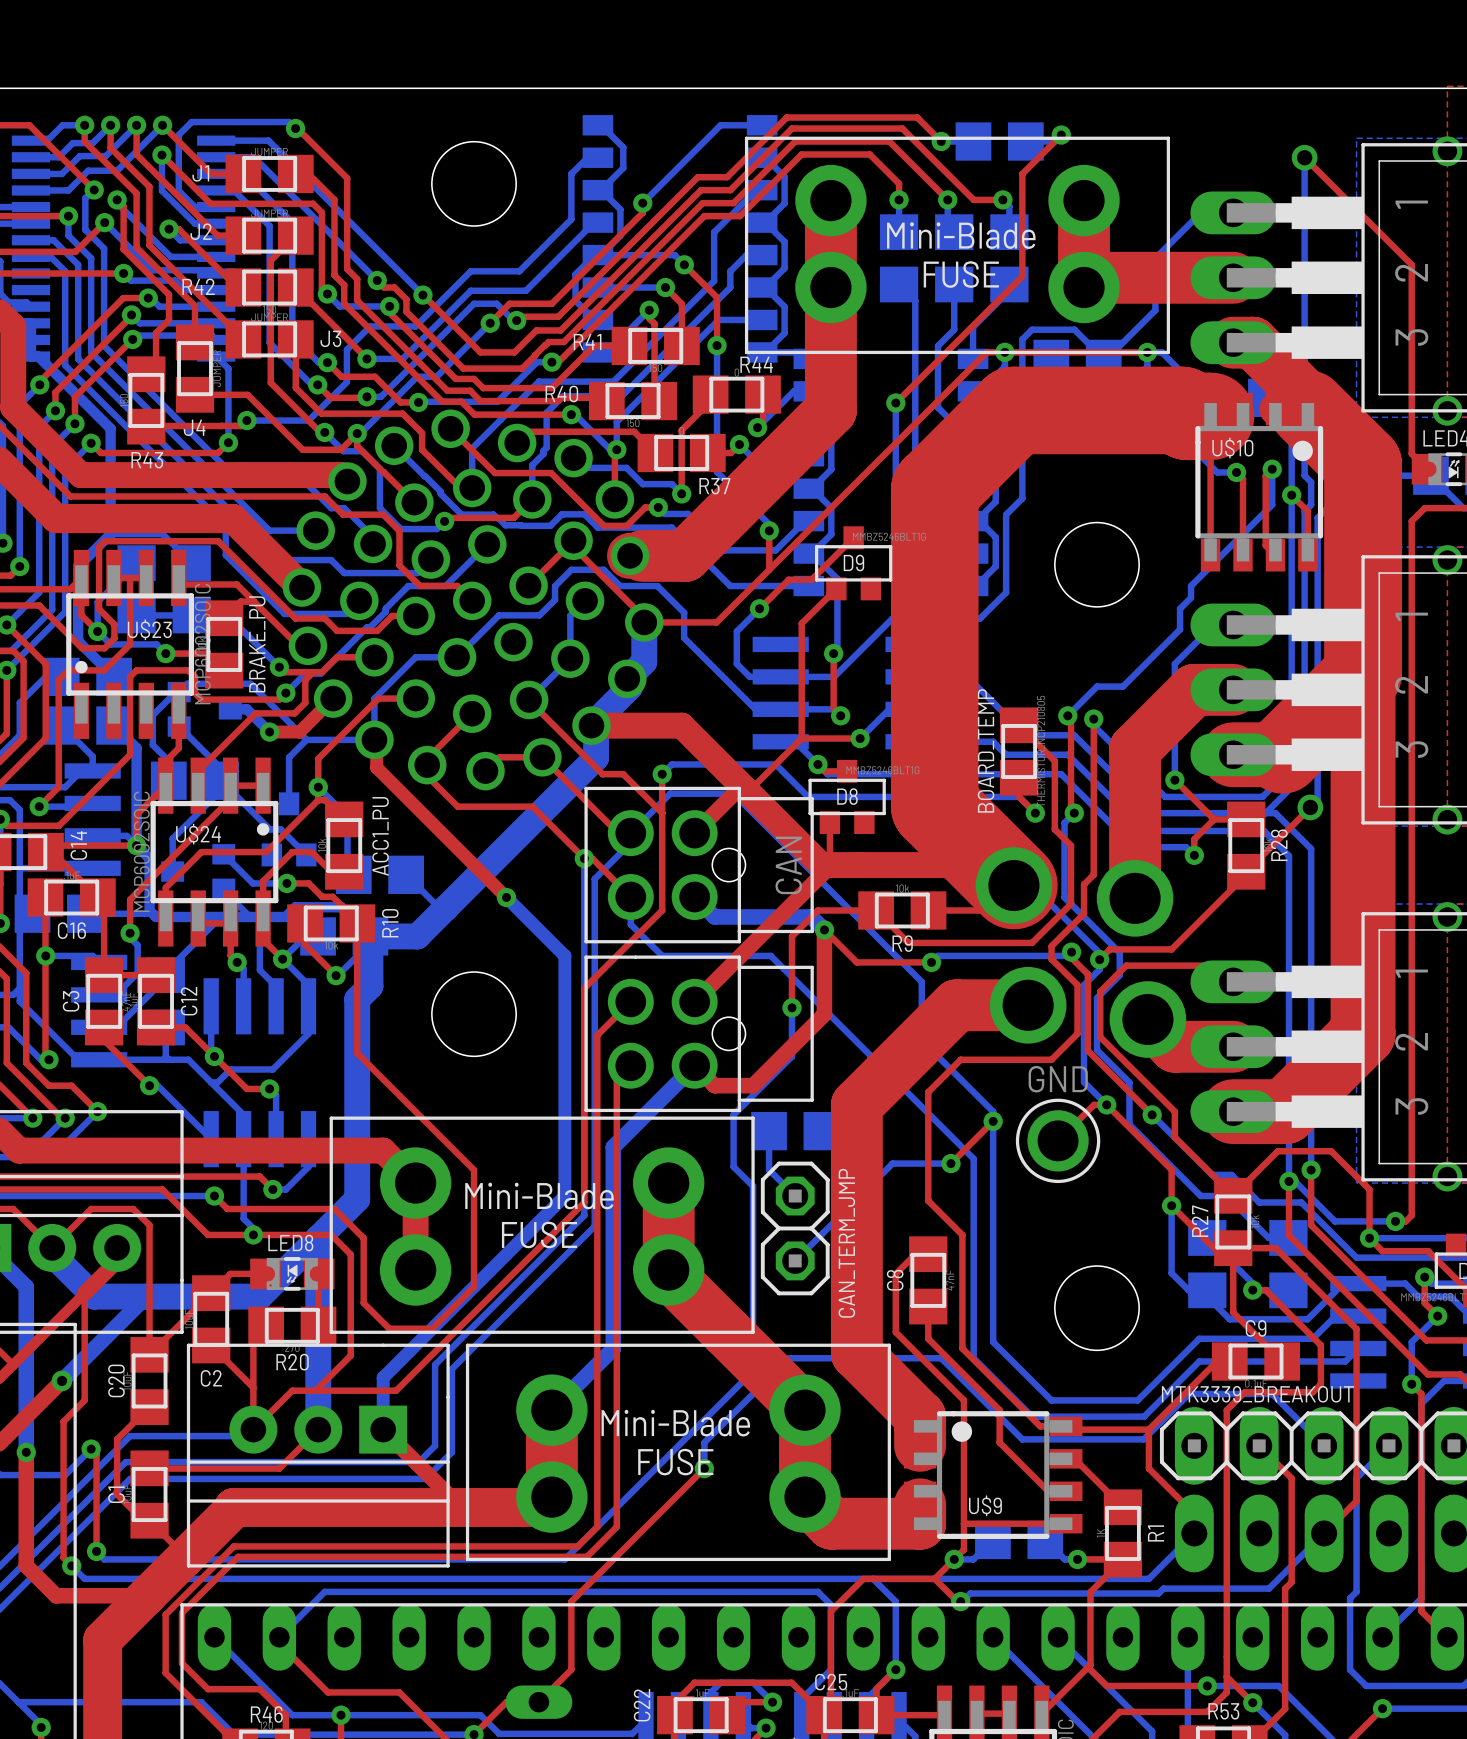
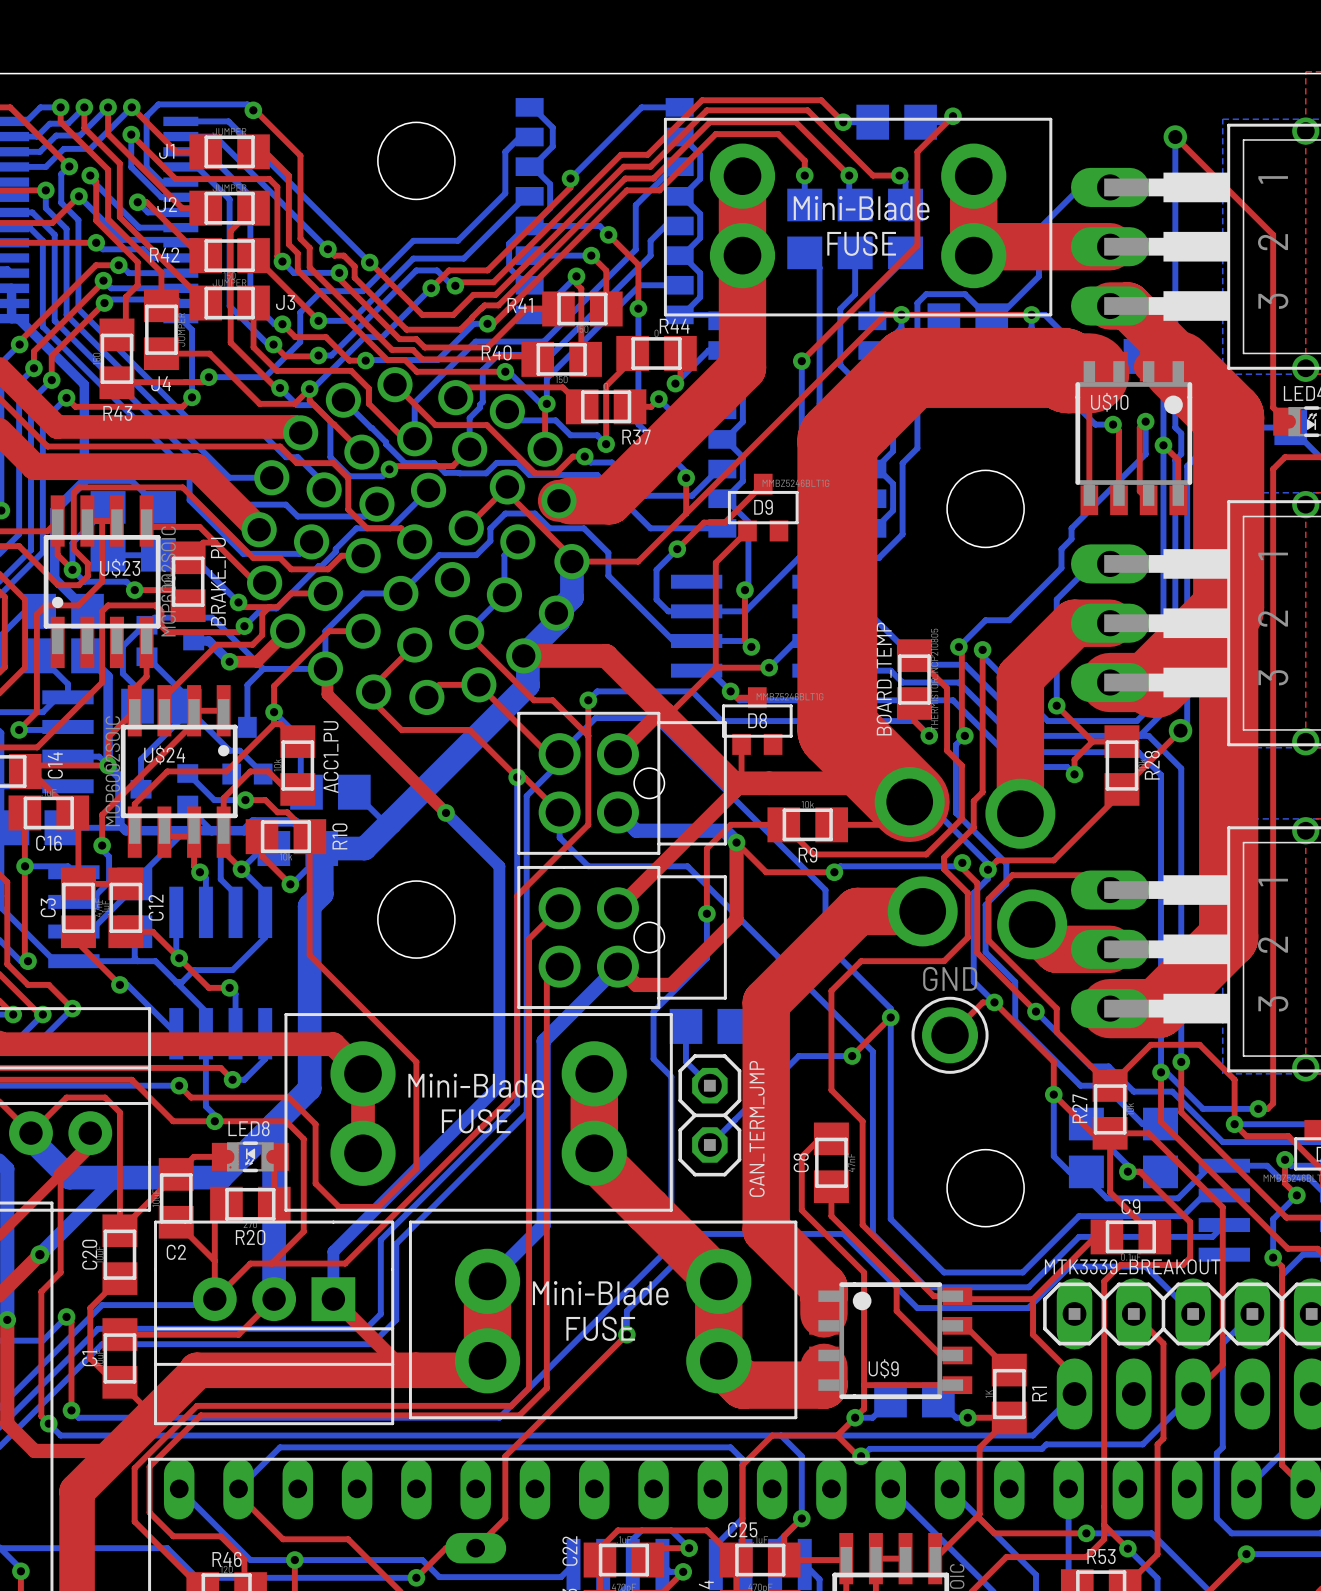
text: CAN (788, 865) -> none

